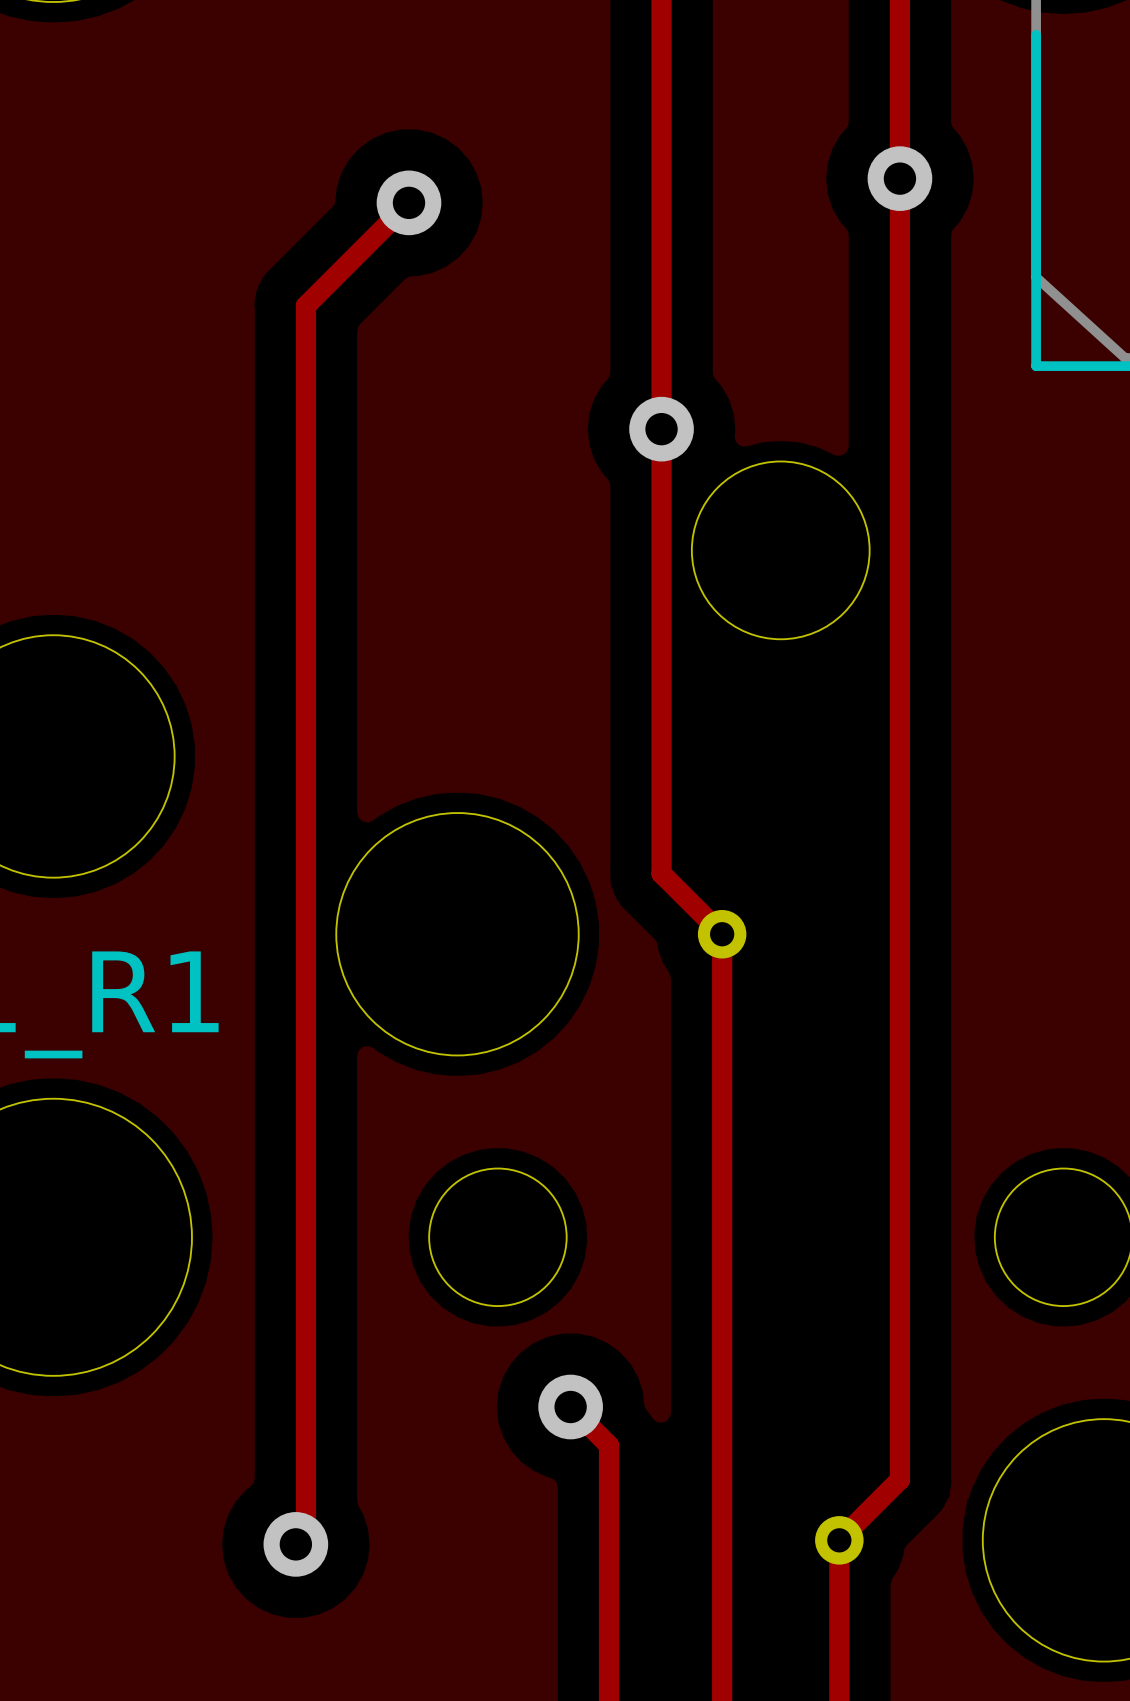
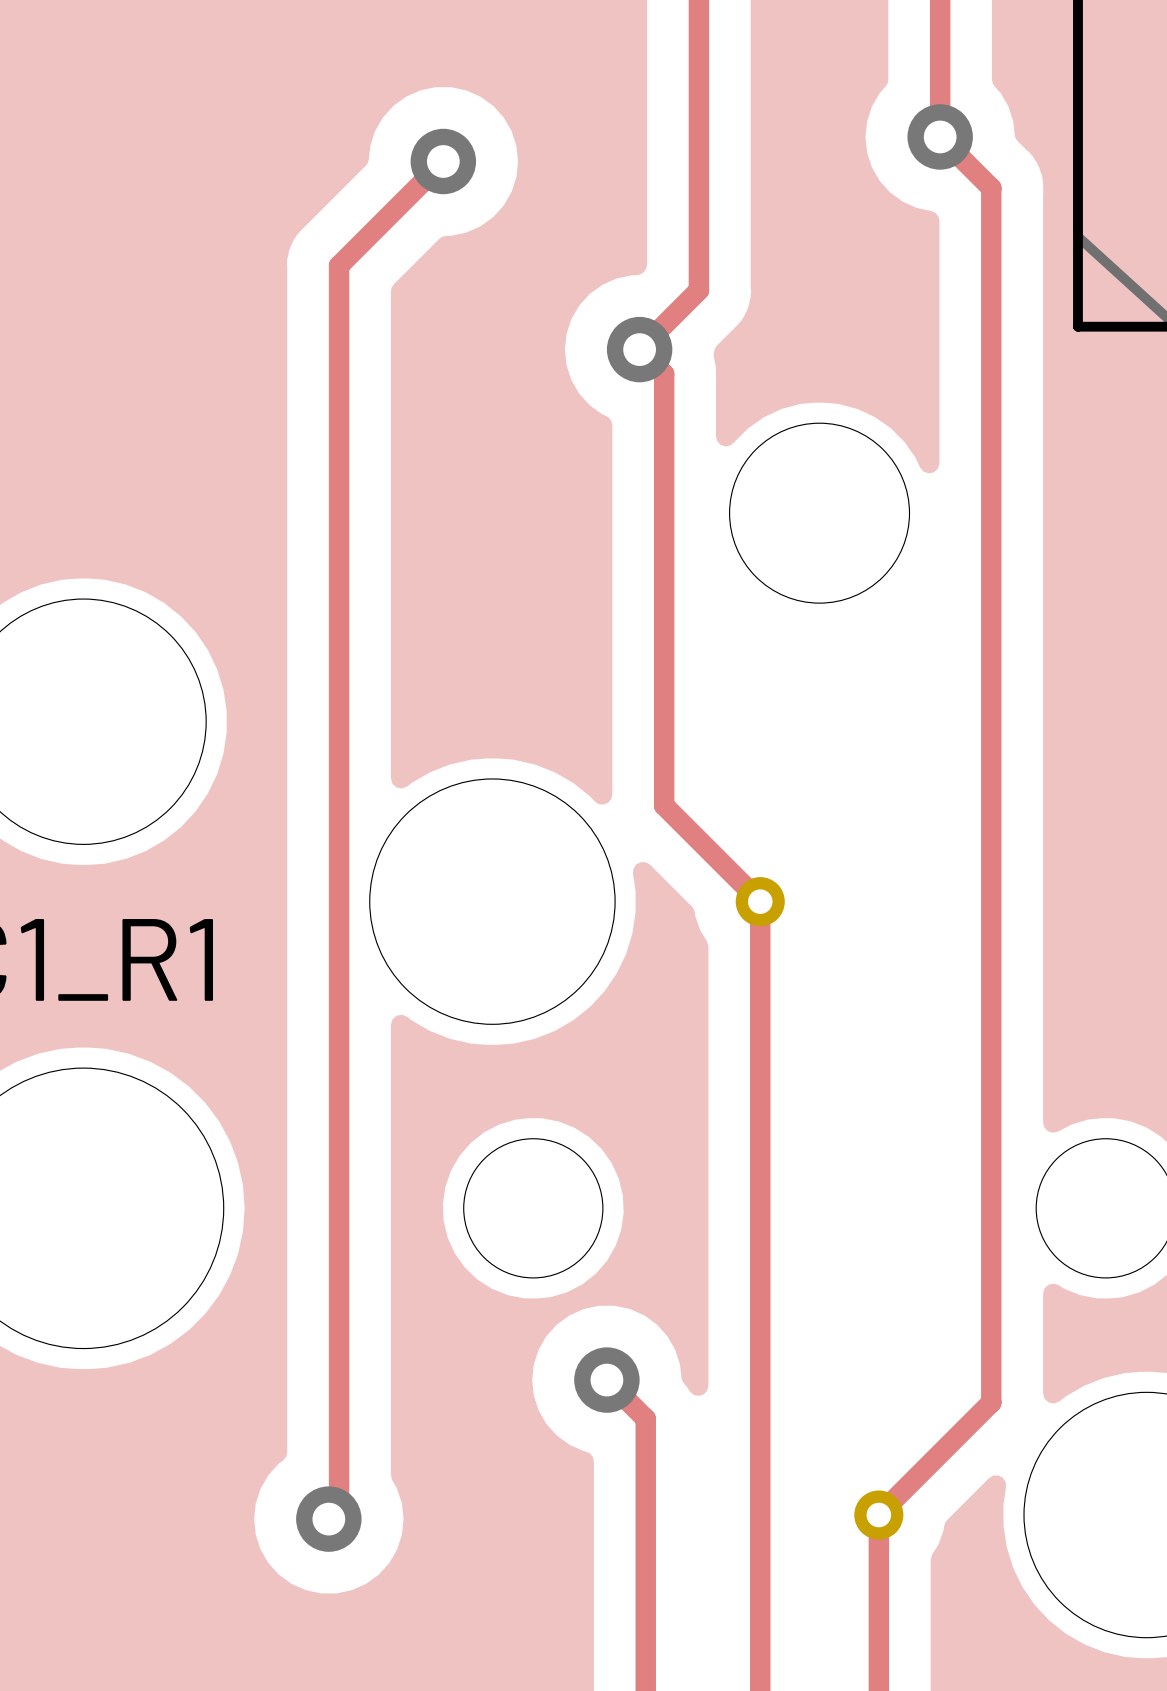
track: (899, 178) (899, 1479) -> (940, 136) (991, 188) (991, 1402) (940, 1453)
track: (661, 330) (661, 873) -> (698, 290) (639, 349) (664, 374) (664, 805) (698, 840)
via position: (661, 429) -> (639, 349)

